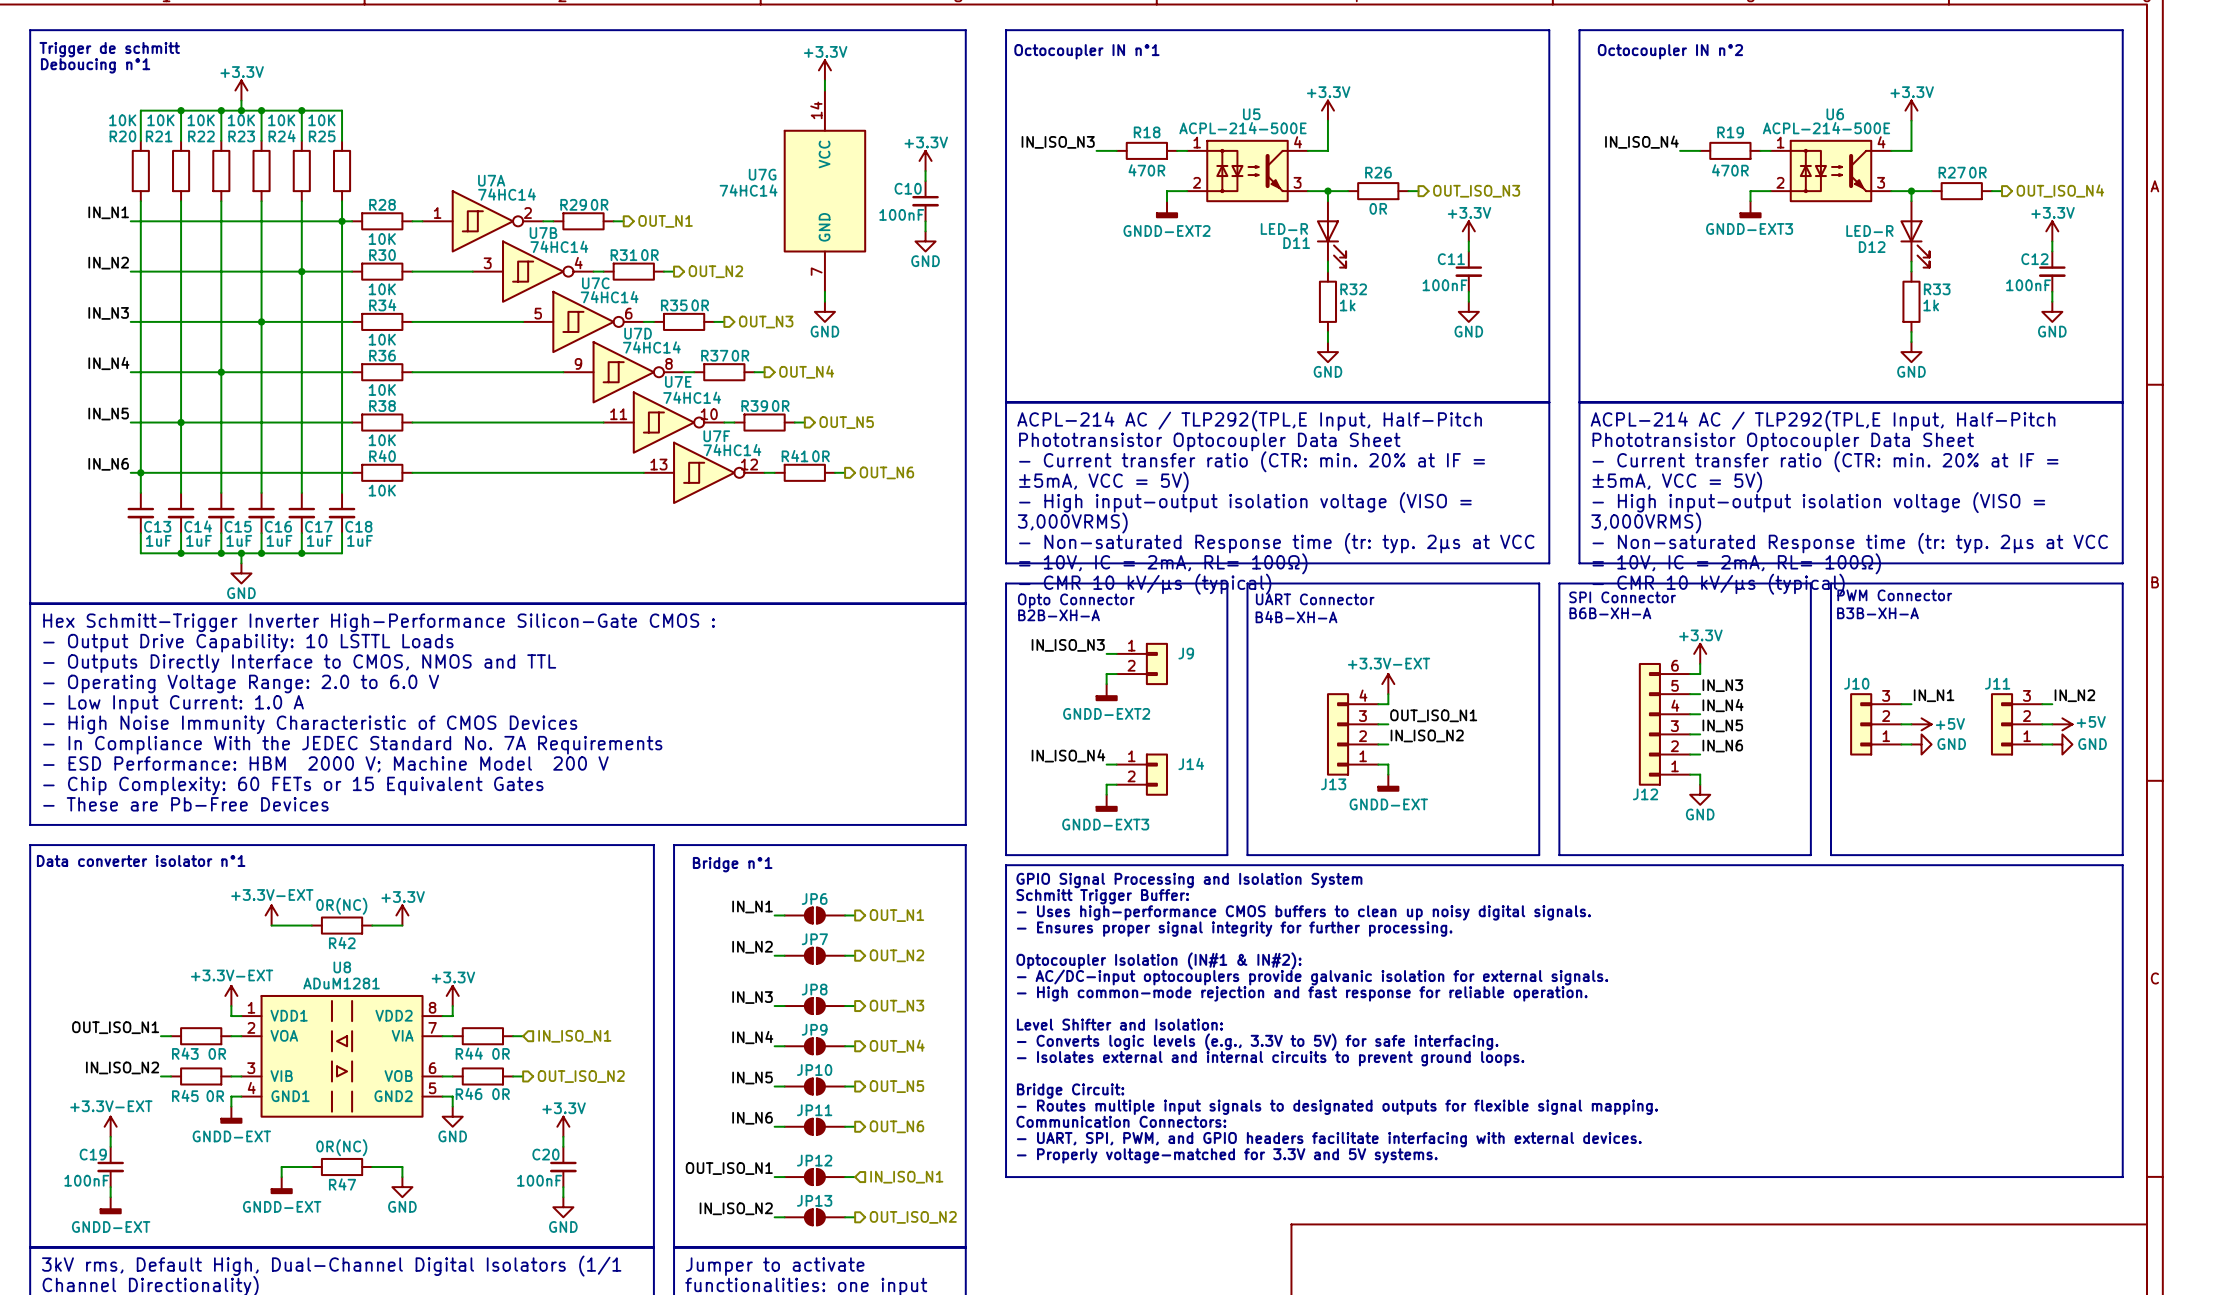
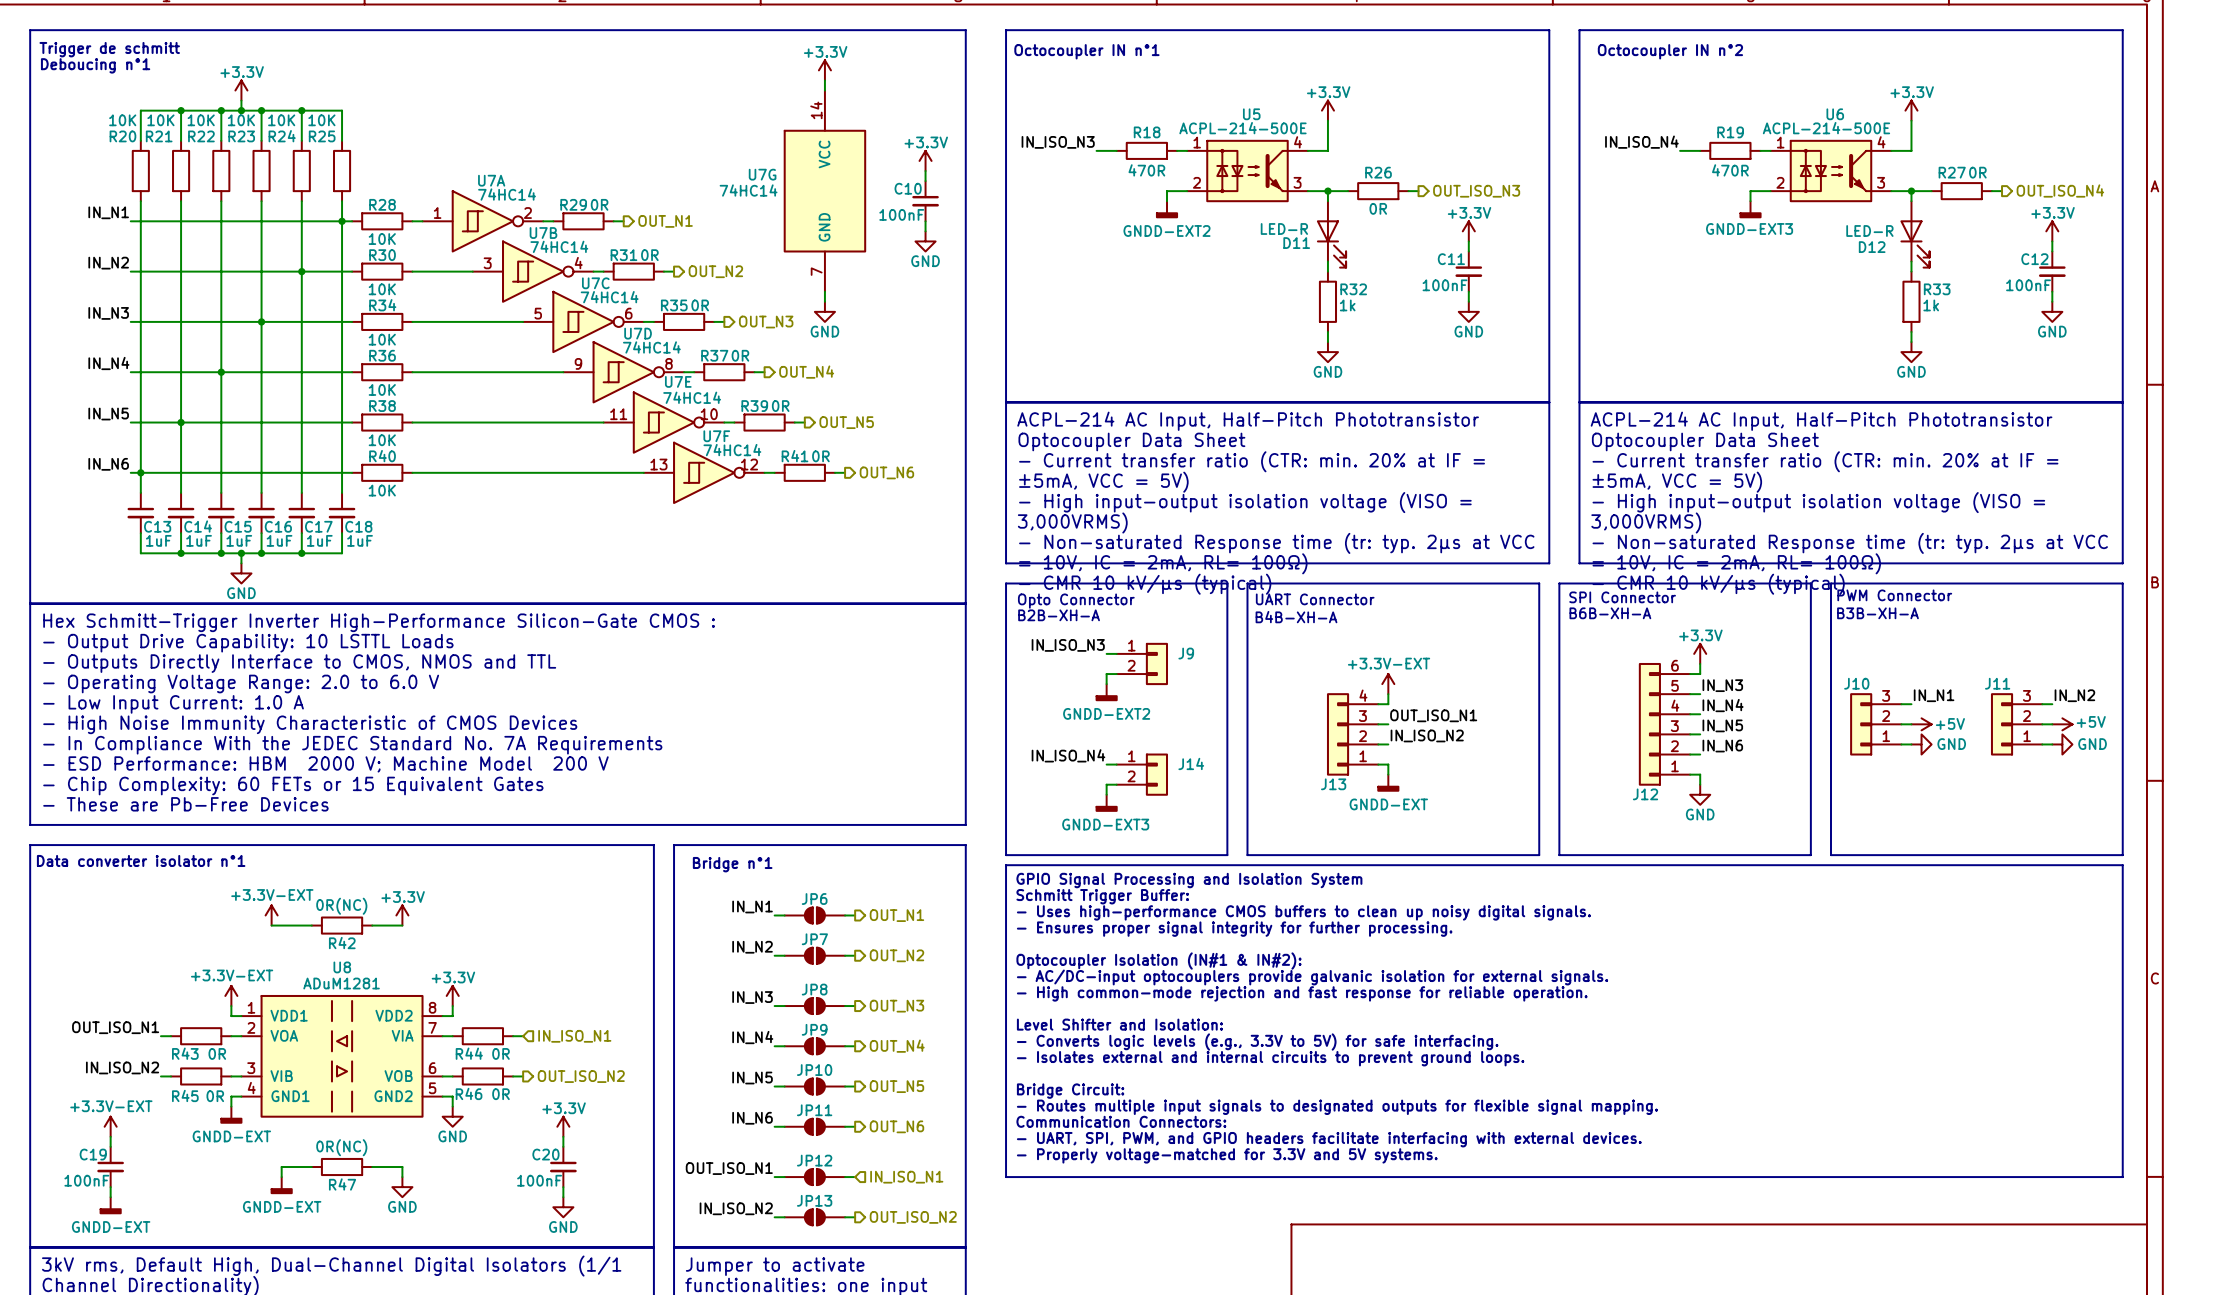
text: ACPL-214 AC / TLP292(TPL,E Input, Half-Pitch (1249, 420) -> ACPL-214 AC Input, Half-Pitch Phototransistor (1248, 421)
text: ACPL-214 AC / TLP292(TPL,E Input, Half-Pitch (1823, 420) -> ACPL-214 AC Input, Half-Pitch Phototransistor (1821, 421)
text: Phototransistor Optocoupler Data Sheet (1209, 441) -> Optocoupler Data Sheet (1131, 441)
text: Phototransistor Optocoupler Data Sheet (1783, 441) -> Optocoupler Data Sheet (1705, 441)

